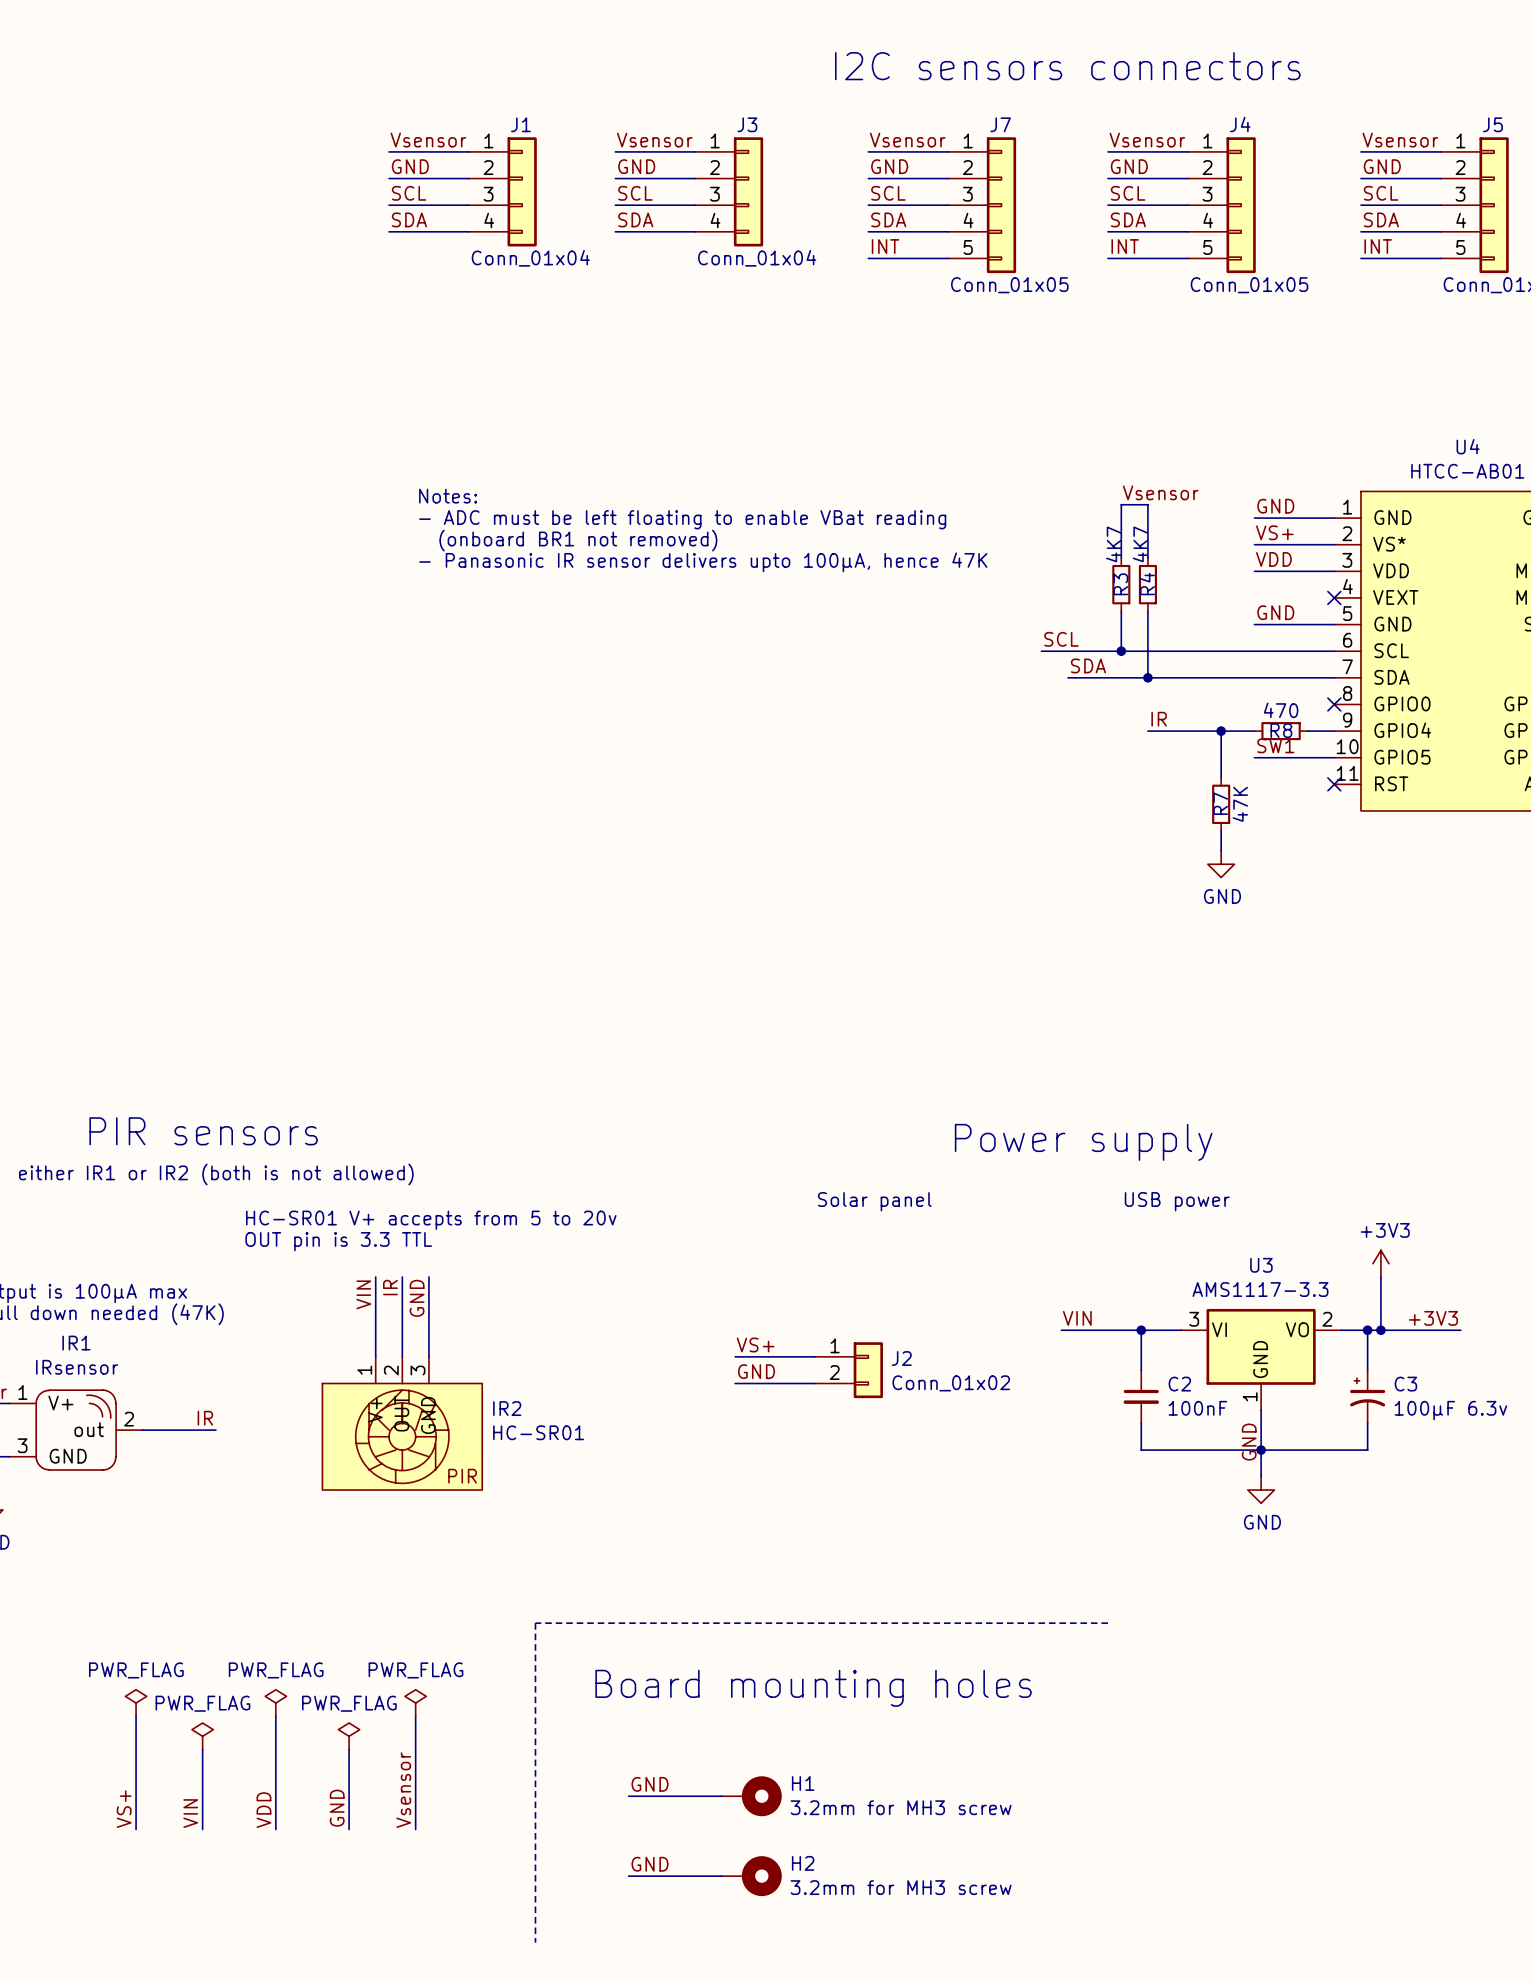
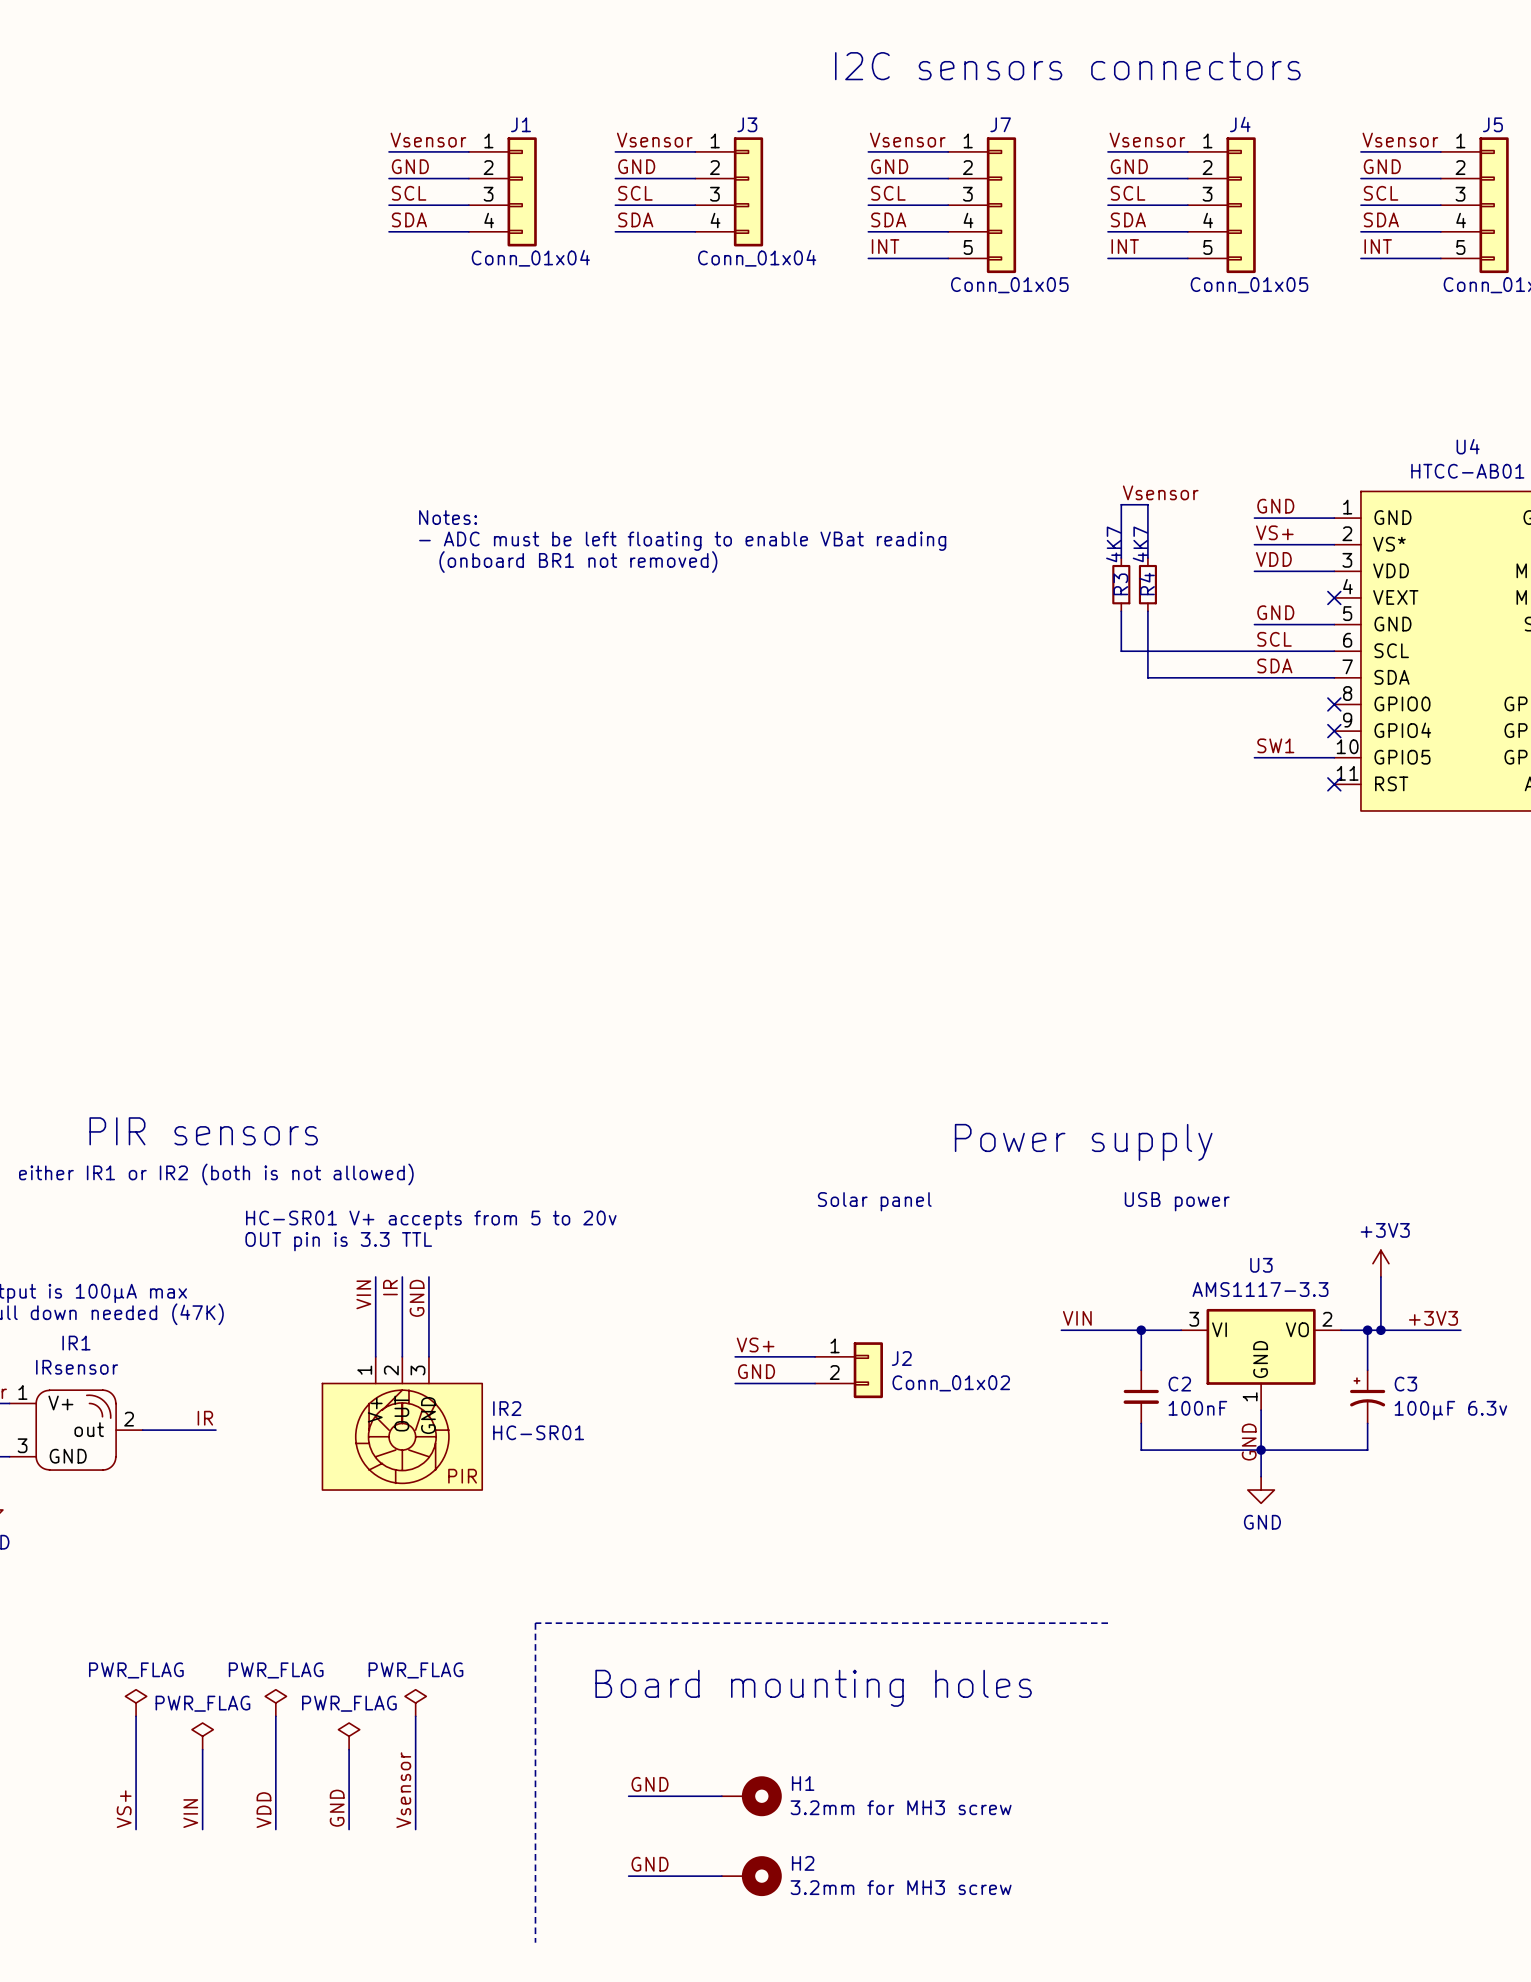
text: Notes: (448, 496) -> none
text: - ADC must be left floating to enable VBat reading (682, 519) -> Notes: (448, 517)
text: (onboard BR1 not removed) (578, 540) -> - ADC must be left floating to enable VBat reading (682, 541)
text: - Panasonic IR sensor delivers upto 100µA, hence 47K (703, 562) -> (onboard BR1 not removed) (578, 562)
label position: SCL (1061, 639) -> SCL (1274, 639)
wire: (1041, 651) (1121, 651) -> none
junction: (1121, 651) -> none
label position: SDA (1088, 665) -> SDA (1274, 665)
wire: (1068, 677) (1147, 677) -> none
junction: (1147, 677) -> none
label: IR (1159, 719) -> none
wire: (1147, 731) (1254, 731) -> none
wire: (1221, 731) (1221, 777) -> none
junction: (1221, 731) -> none
R8: 470 (1281, 731) -> none
wire: (1307, 731) (1334, 731) -> none
no-connect mark: none -> (1334, 731)
R7: 47K (1221, 804) -> none
wire: (1221, 830) (1221, 850) -> none
power symbol: GND (1221, 864) -> none

